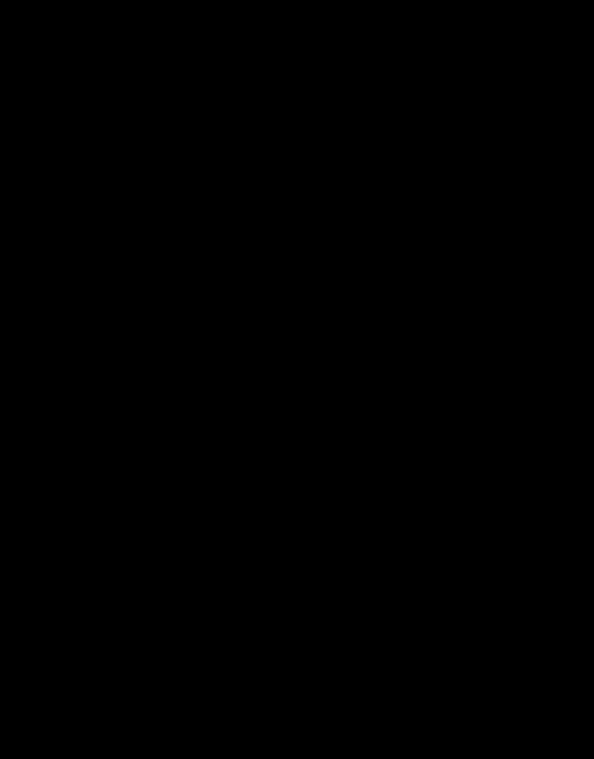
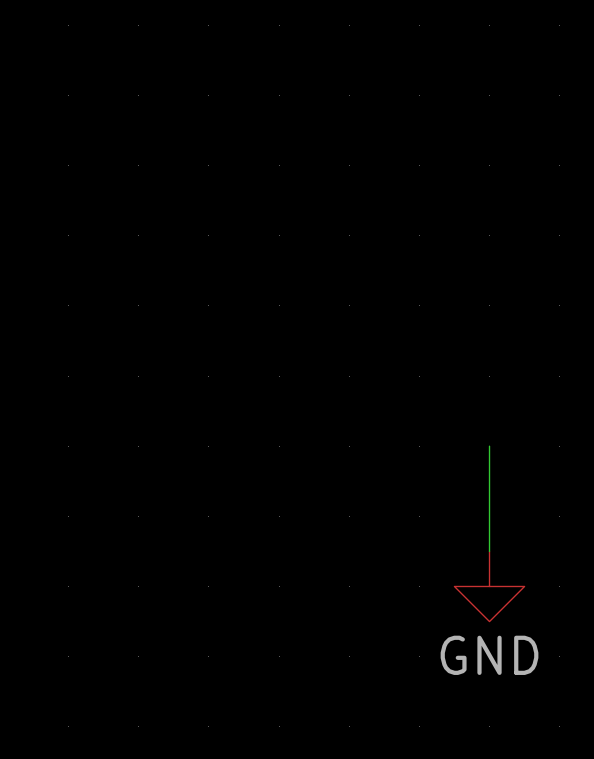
wire: none -> (489, 446) (489, 551)
power symbol: none -> GND (489, 586)

